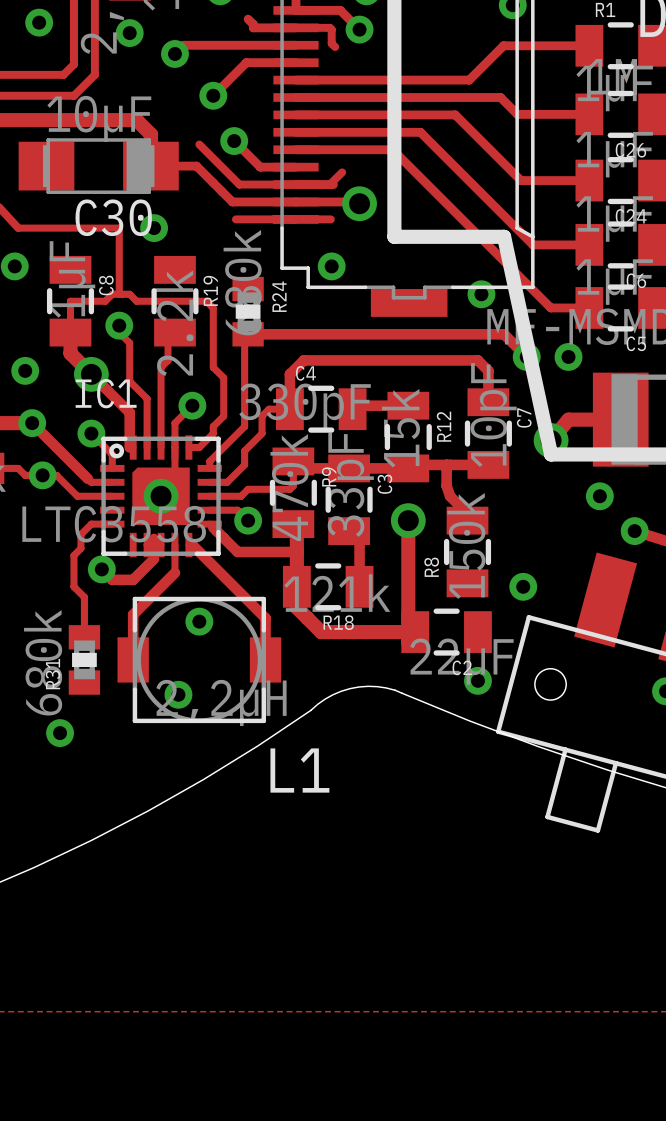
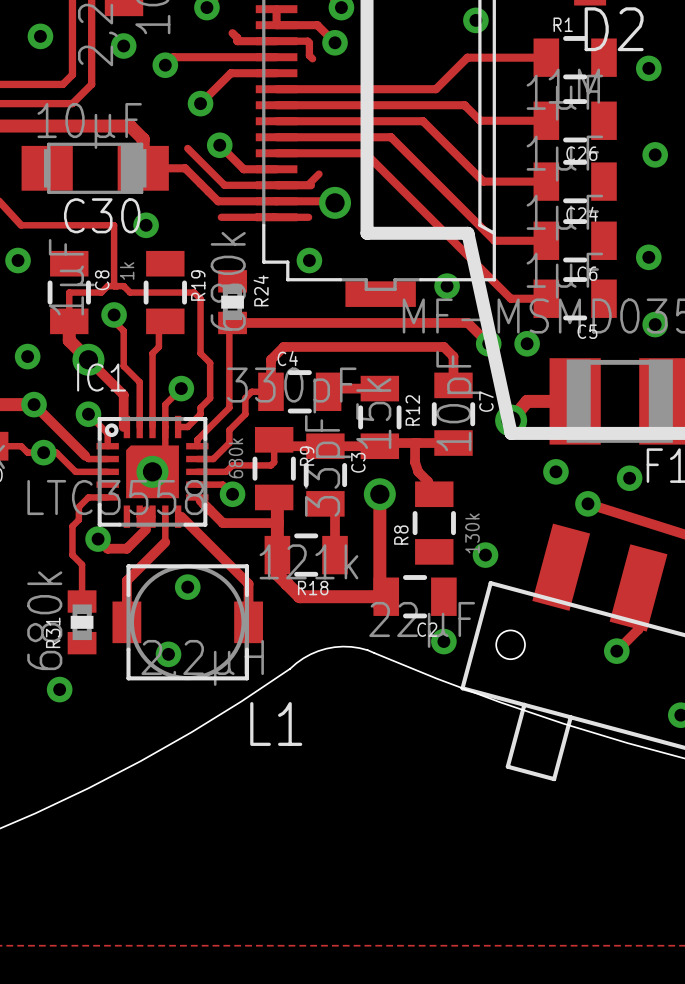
R19 value: 2.2k (174, 323) -> 1k (127, 271)
R9 value: 470k (289, 487) -> 680k (235, 458)
R8 value: 150k (466, 545) -> 130k (472, 533)

